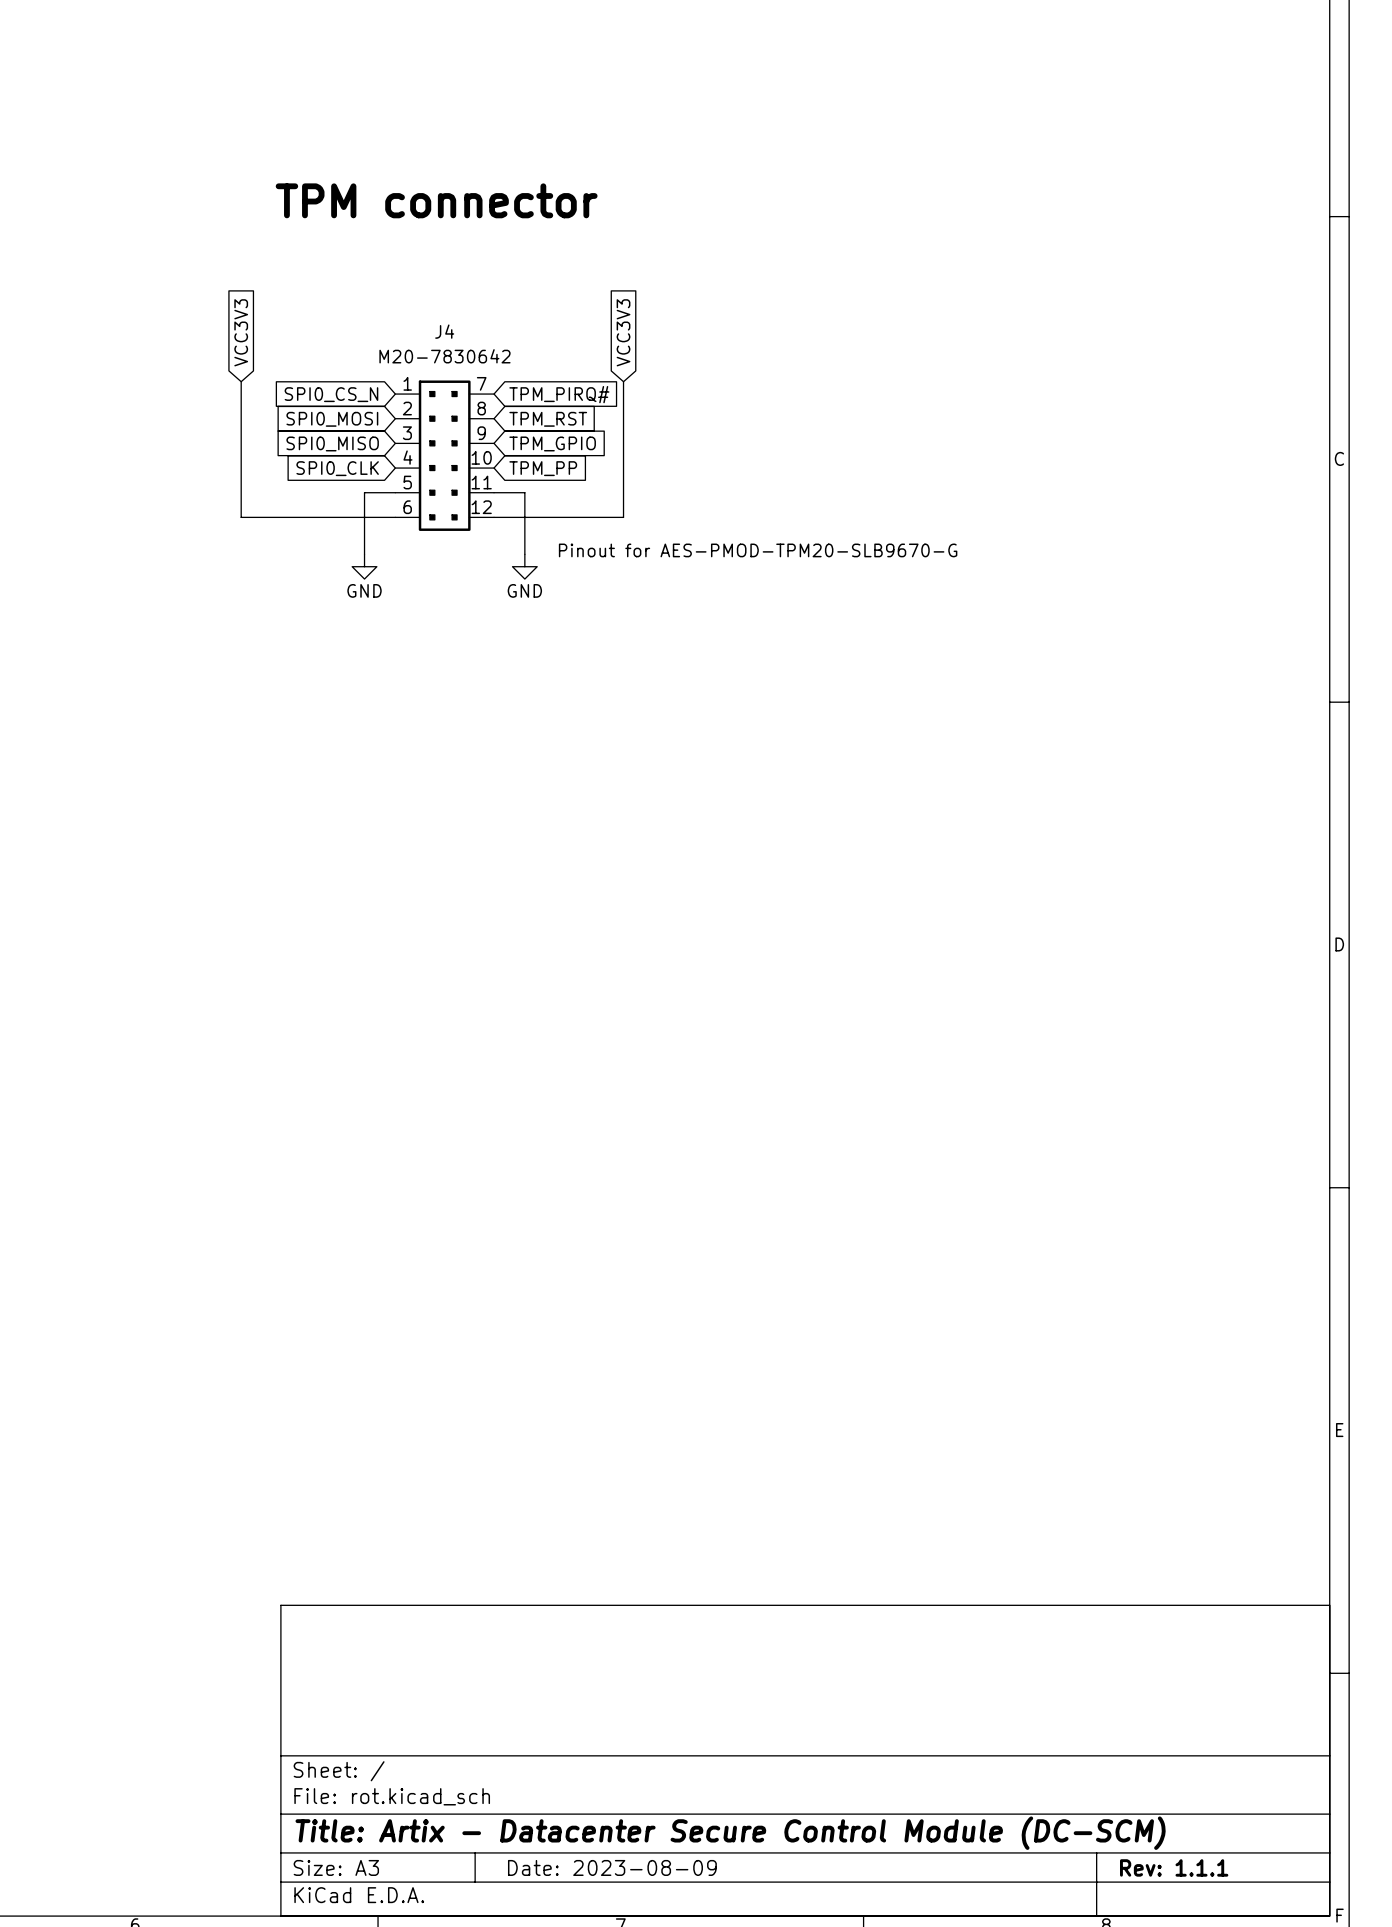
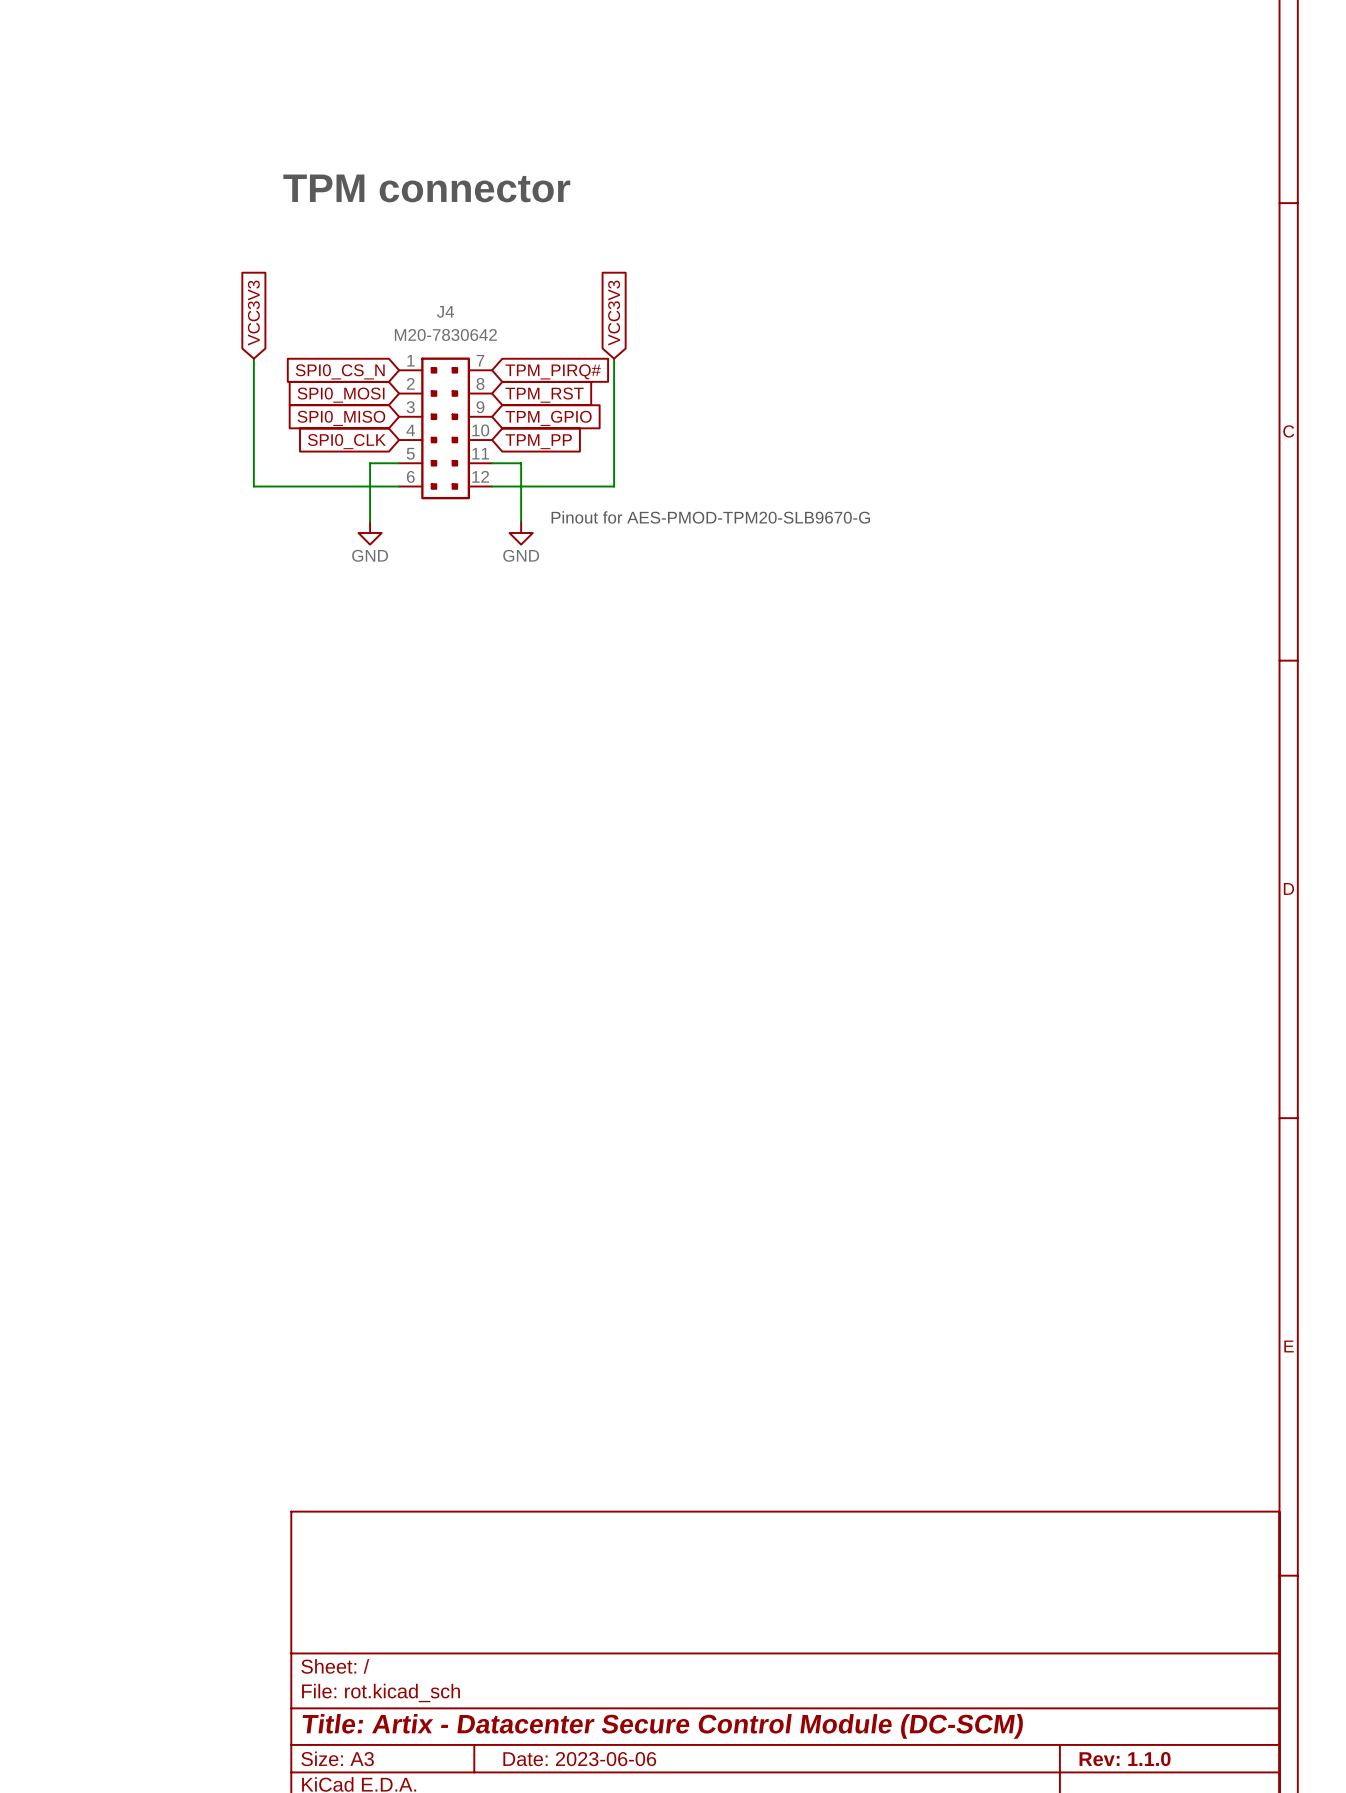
title block: Date: 2023-08-09 (612, 1867) -> Date: 2023-06-06 (579, 1759)
title block: Rev: 1.1.1 (1174, 1867) -> Rev: 1.1.0 (1125, 1759)

